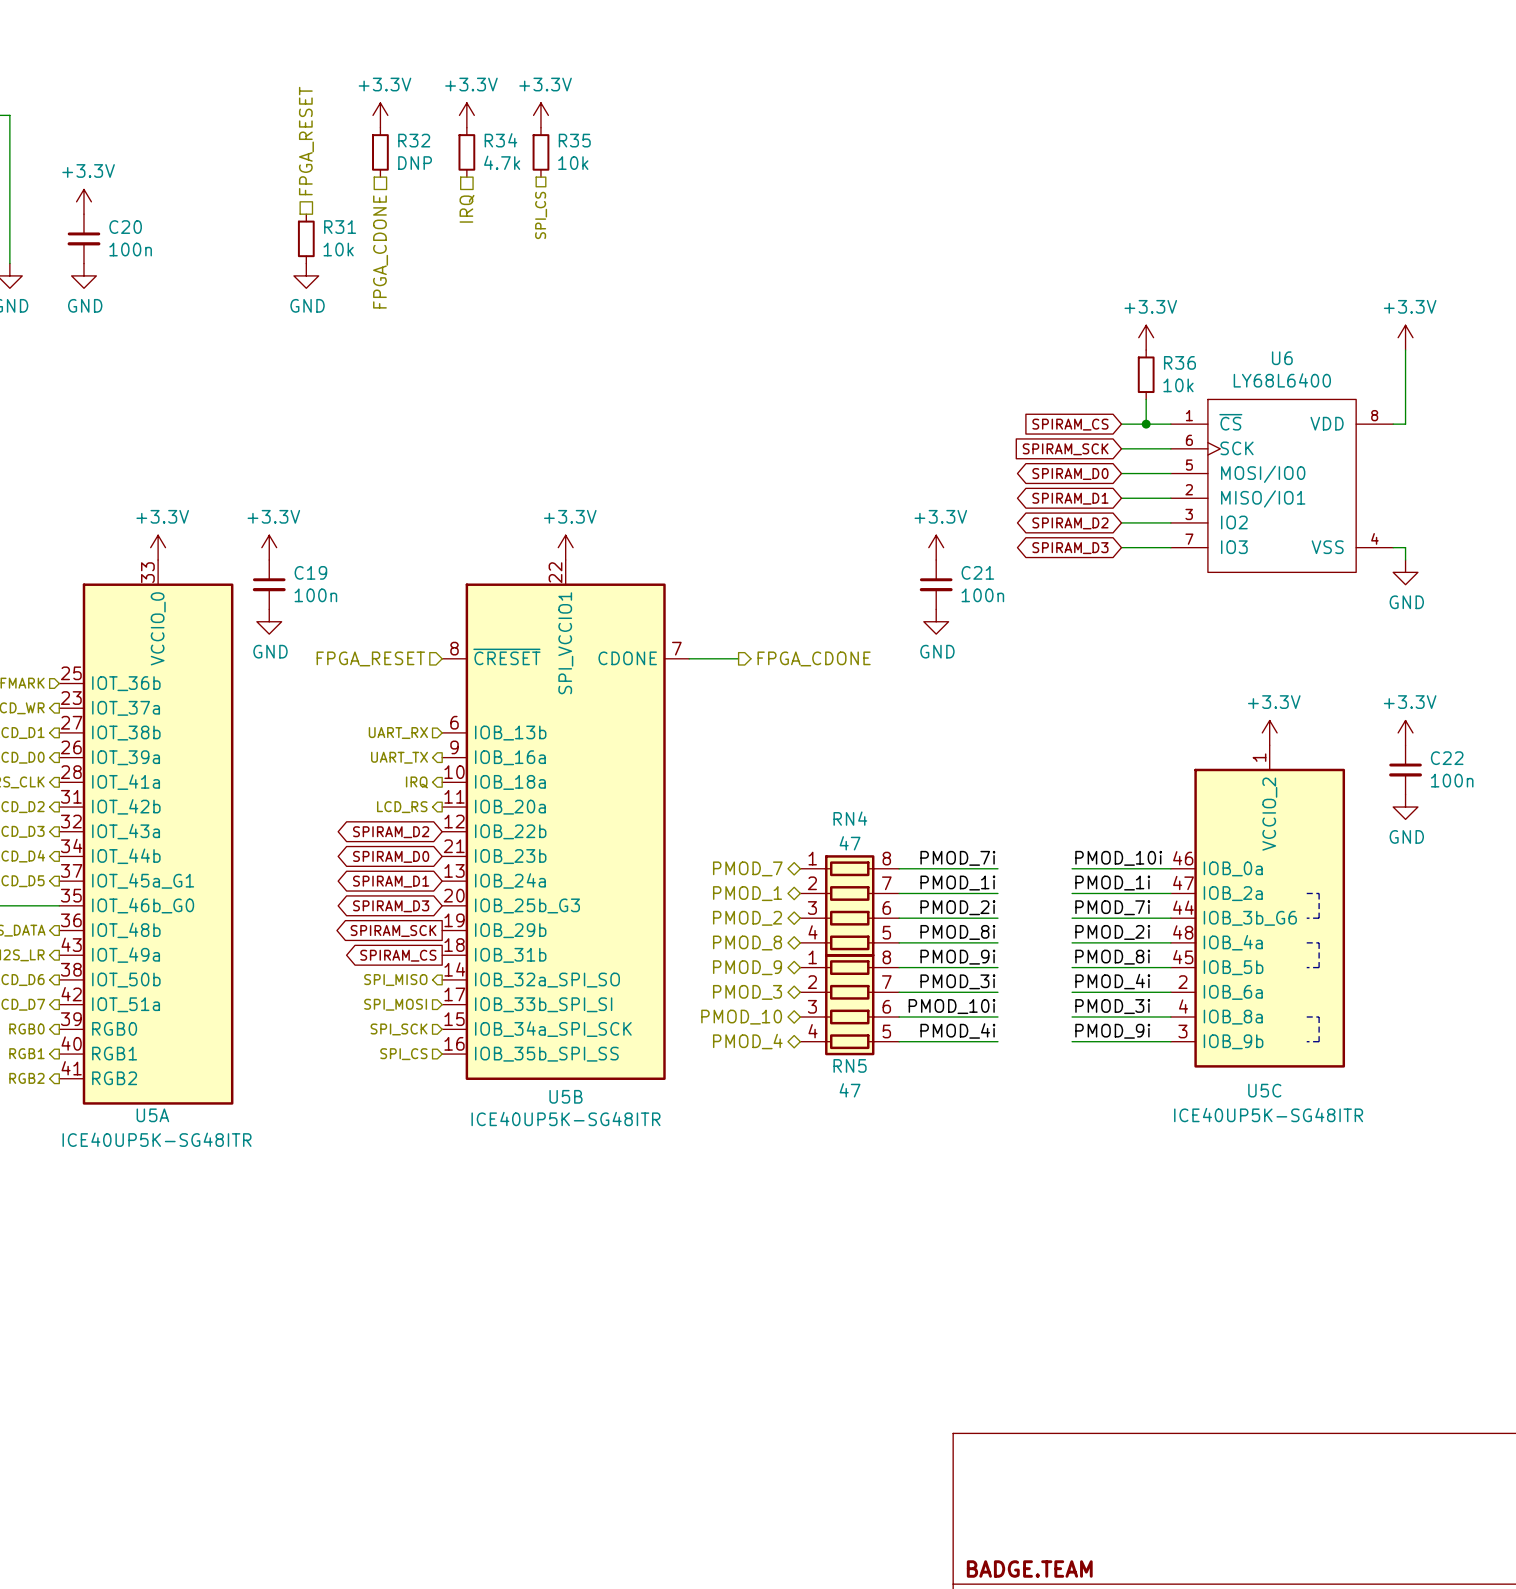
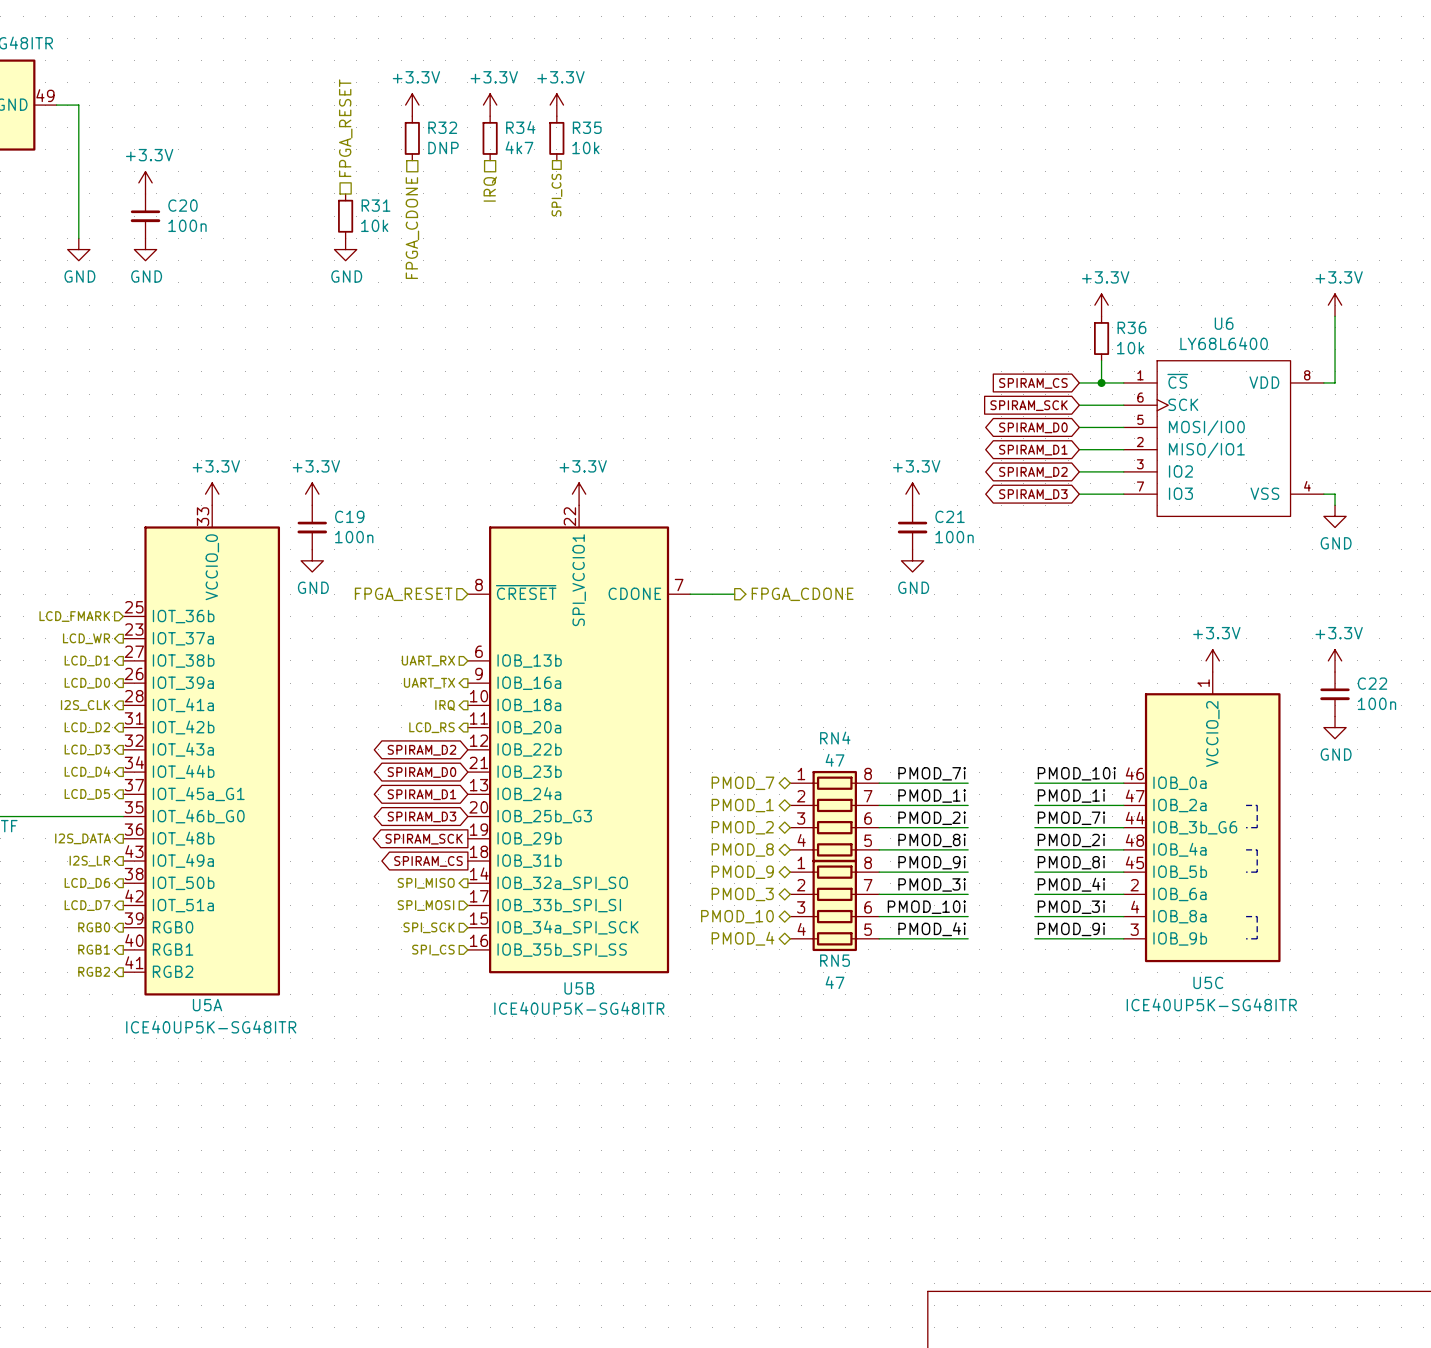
R34 value: 4.7k (502, 162) -> 4k7 (519, 147)

